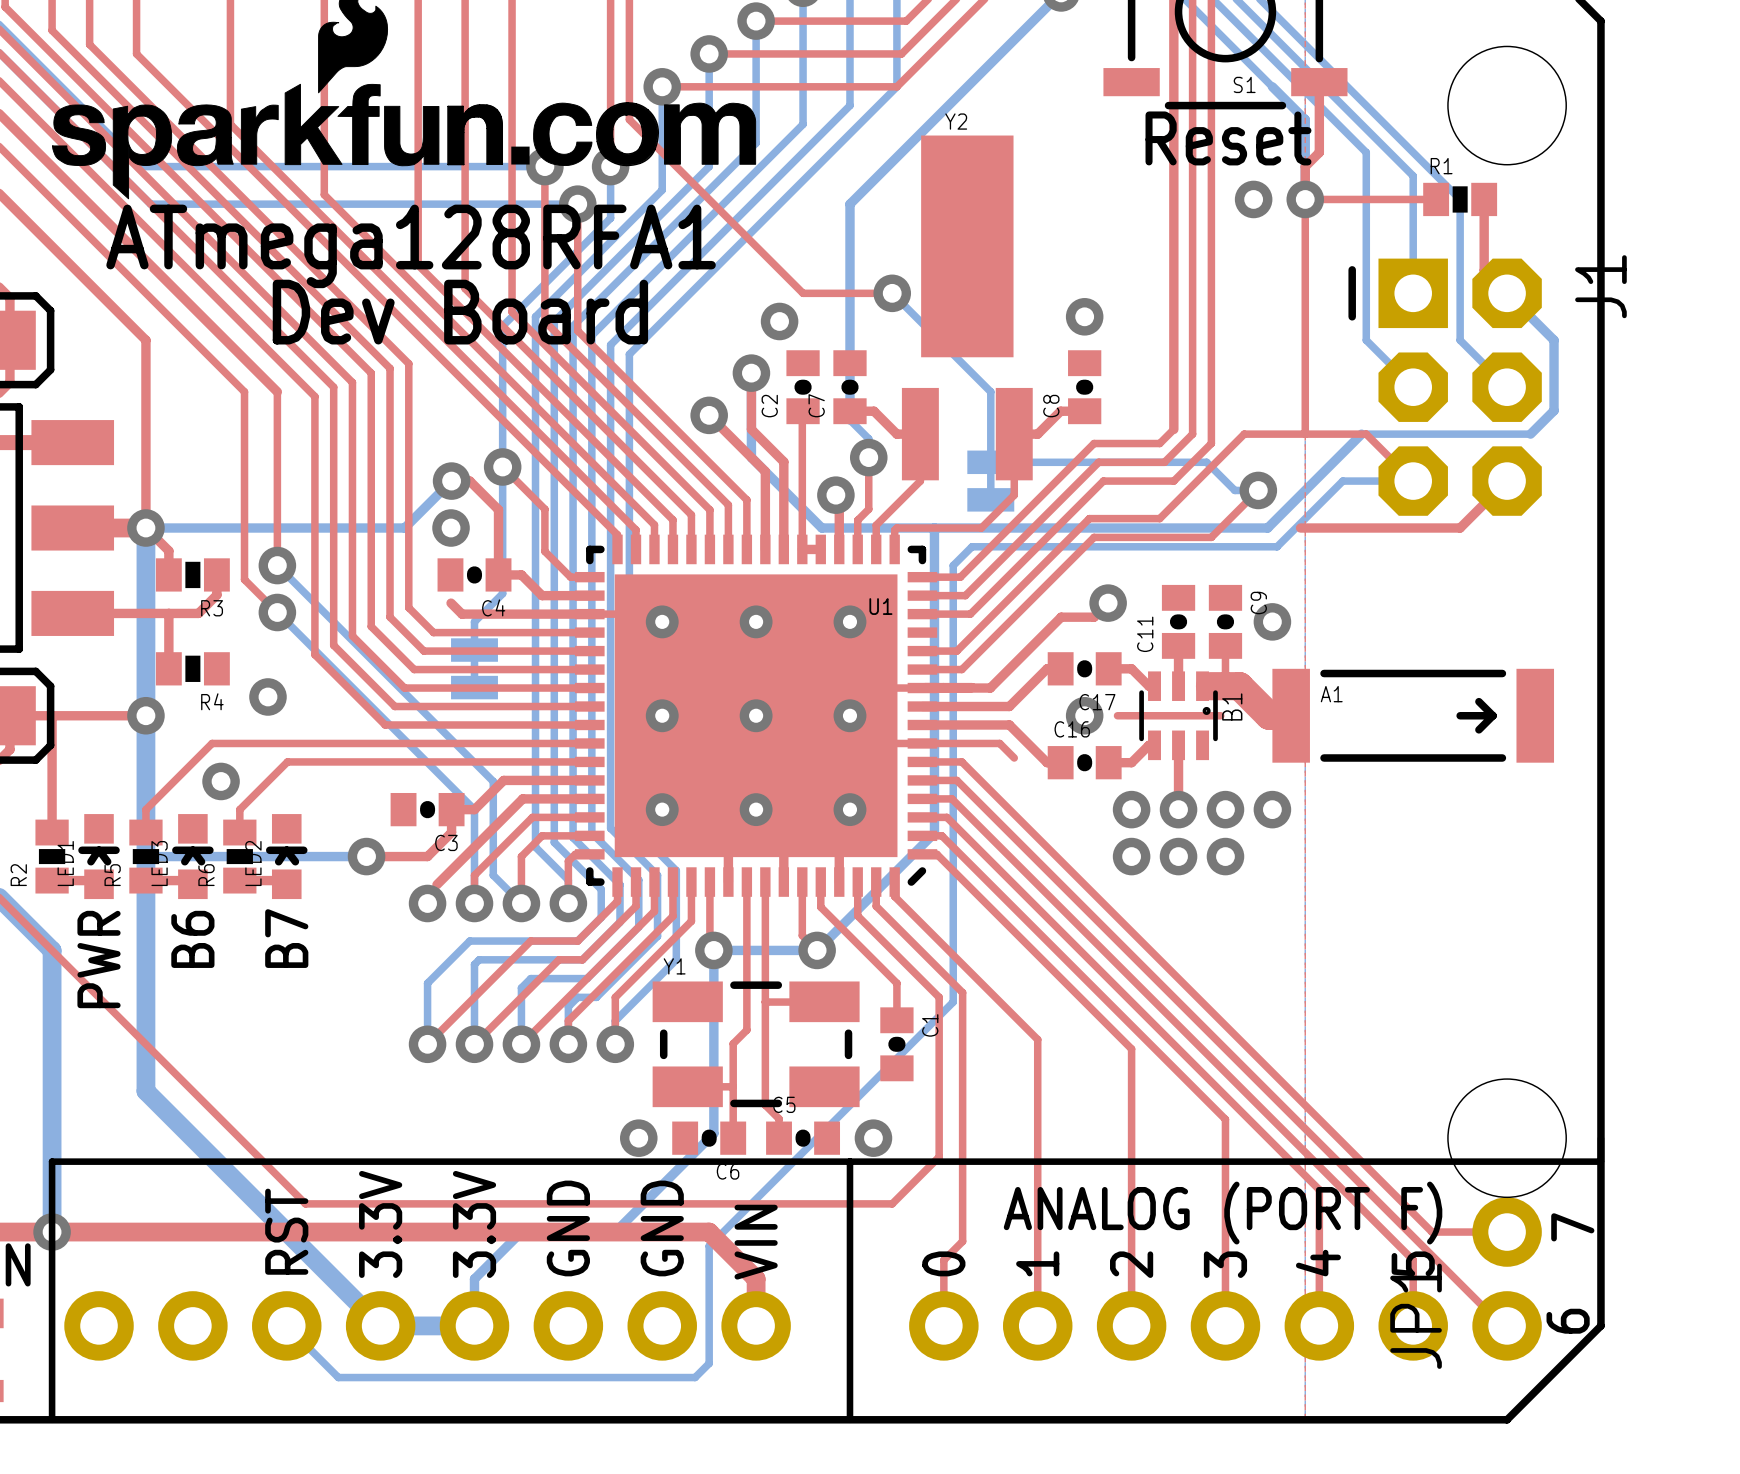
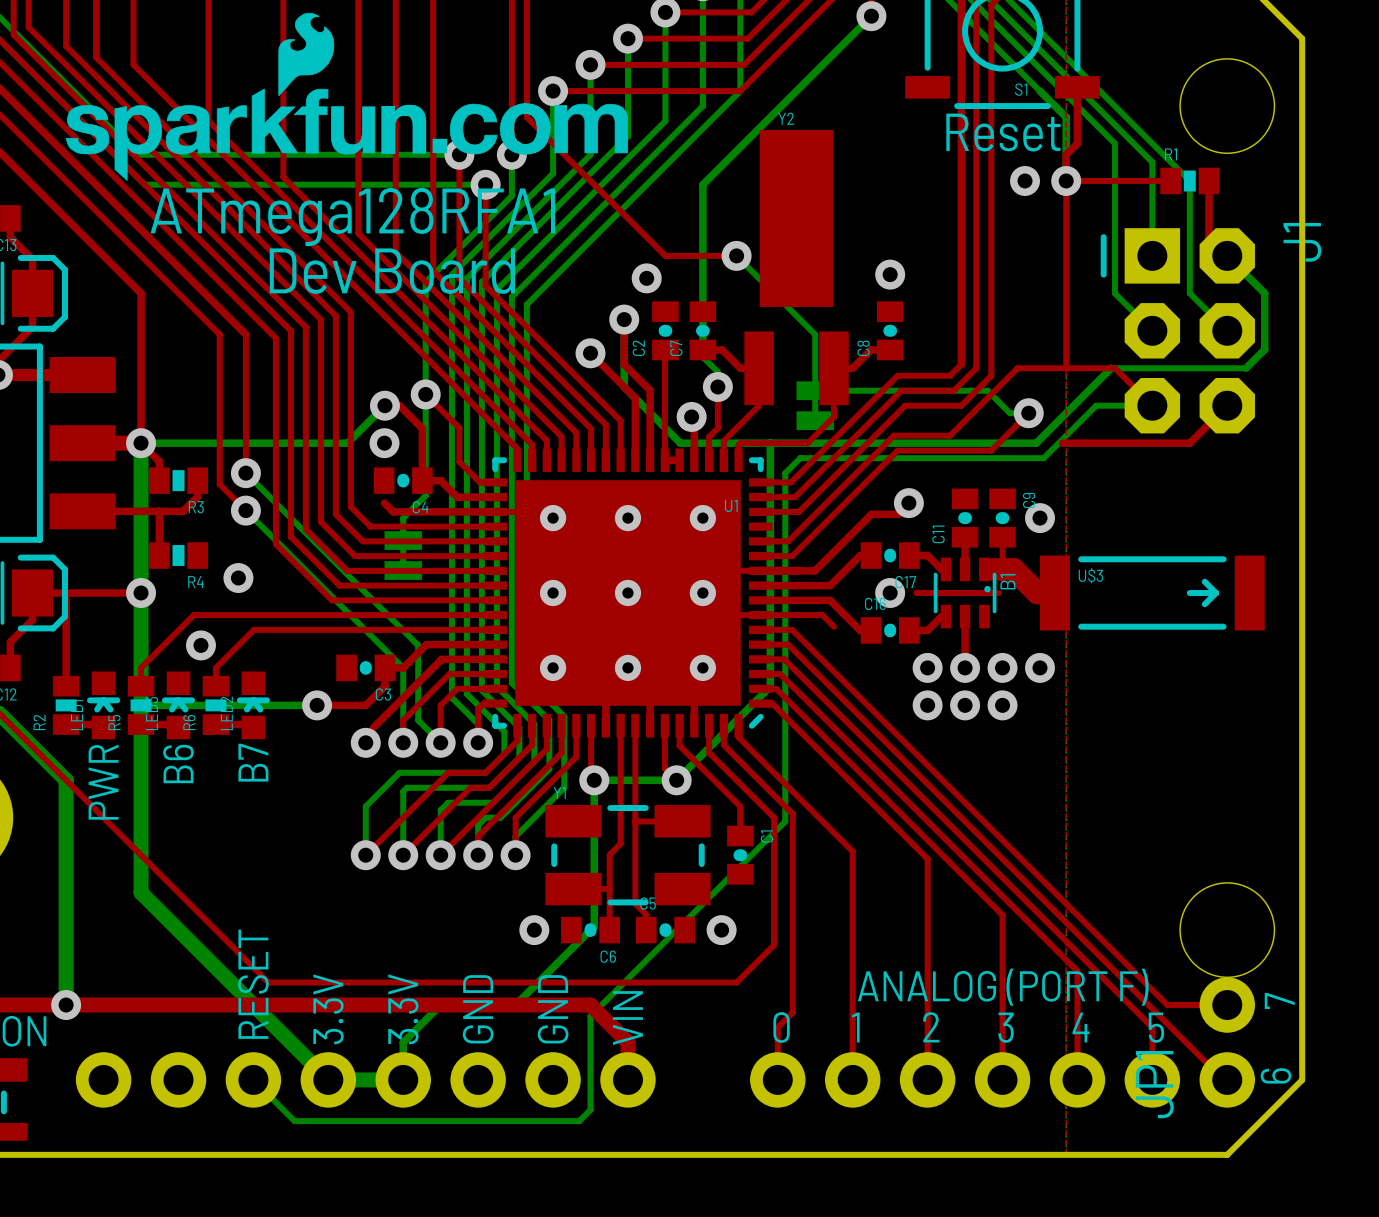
A1 name: A1 (1331, 694) -> U$3 (1090, 575)
line: (1600, 1138) (1600, 1161) (52, 1161) (52, 1419) -> none
line: (849, 1161) (849, 1419) -> none
text: RST (286, 1231) -> RESET (253, 984)
text rotation: 0° (943, 1263) -> 90° clockwise (781, 1027)
text rotation: 0° (1037, 1263) -> 90° clockwise (855, 1027)
text rotation: 0° (1318, 1263) -> 90° clockwise (1080, 1027)
text rotation: 0° (1413, 1263) -> 90° clockwise (1156, 1027)
text rotation: 0° (1131, 1264) -> 90° clockwise (931, 1027)
text rotation: 0° (1225, 1264) -> 90° clockwise (1005, 1027)

